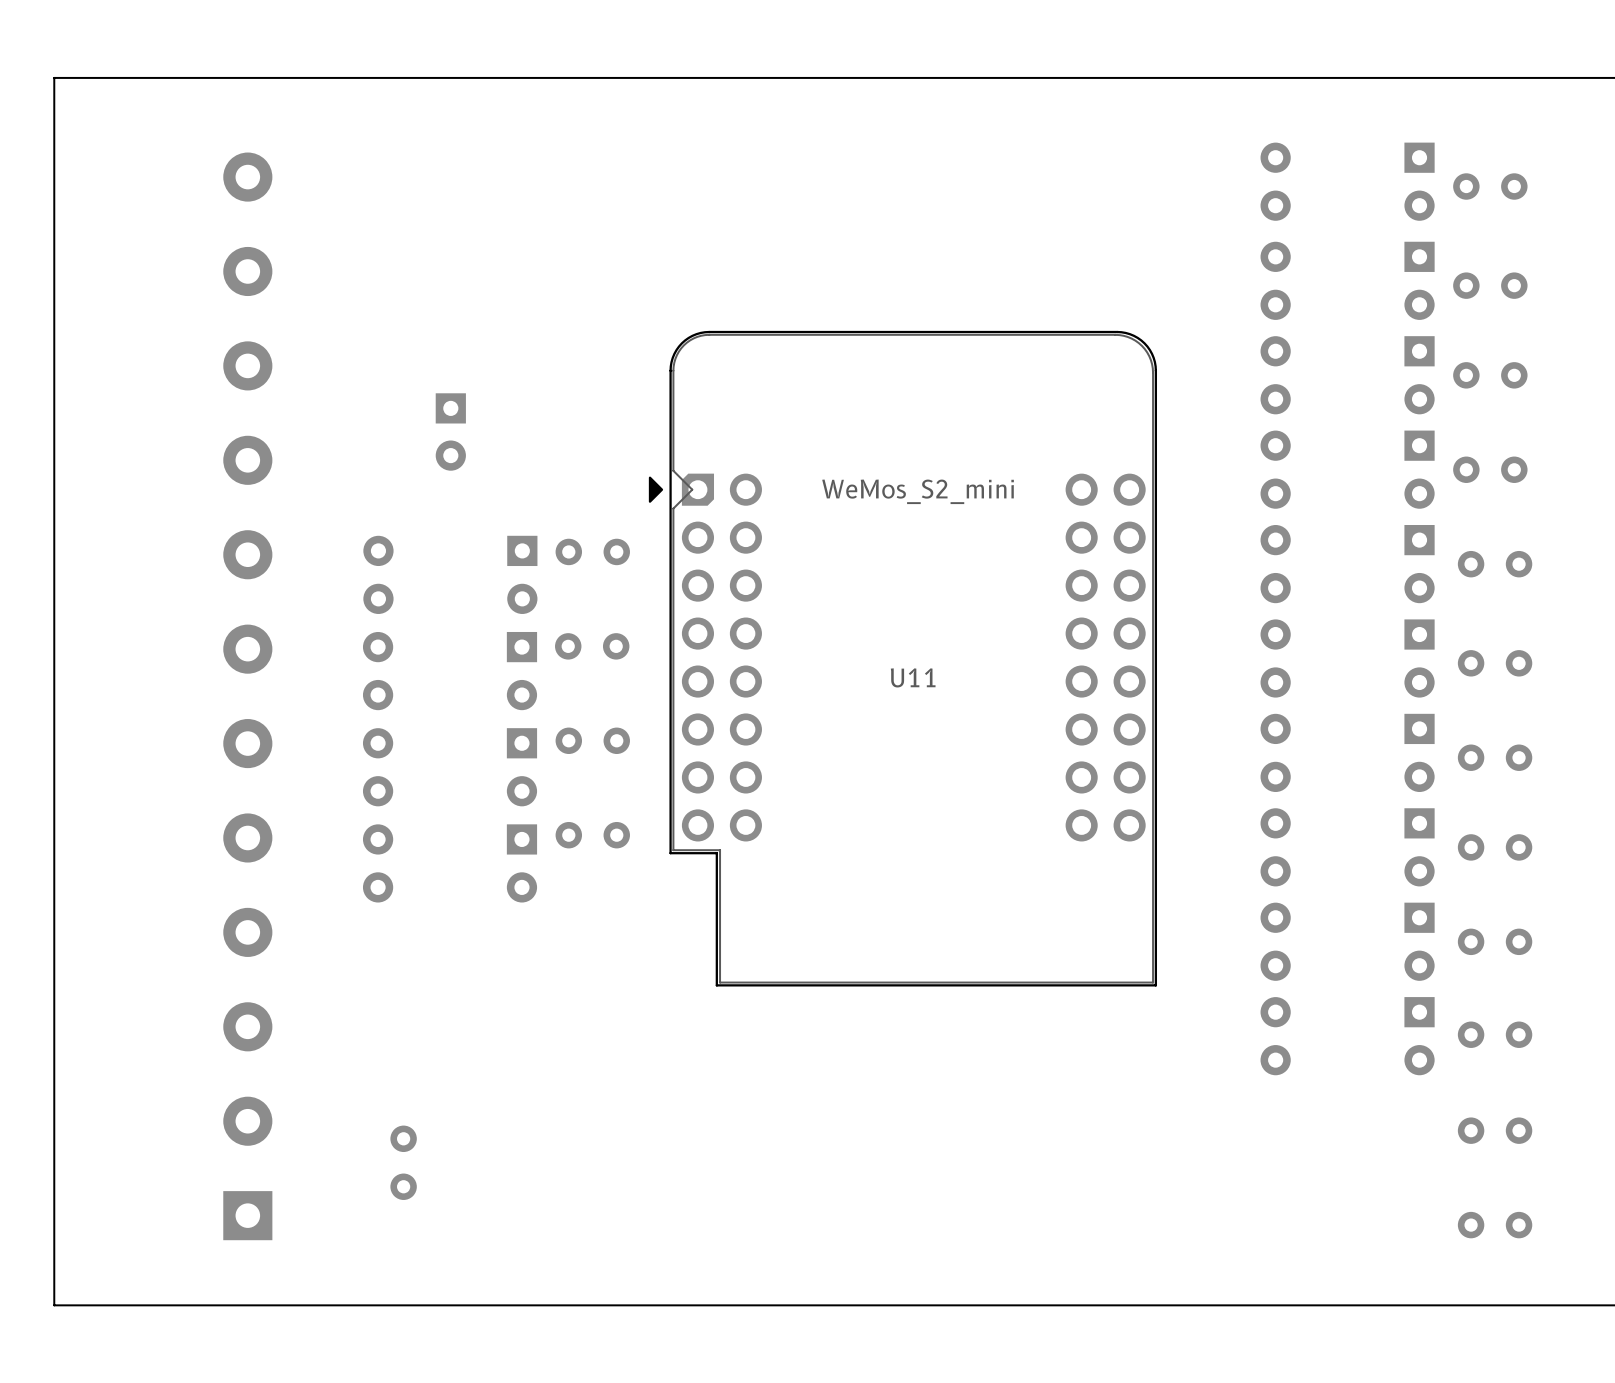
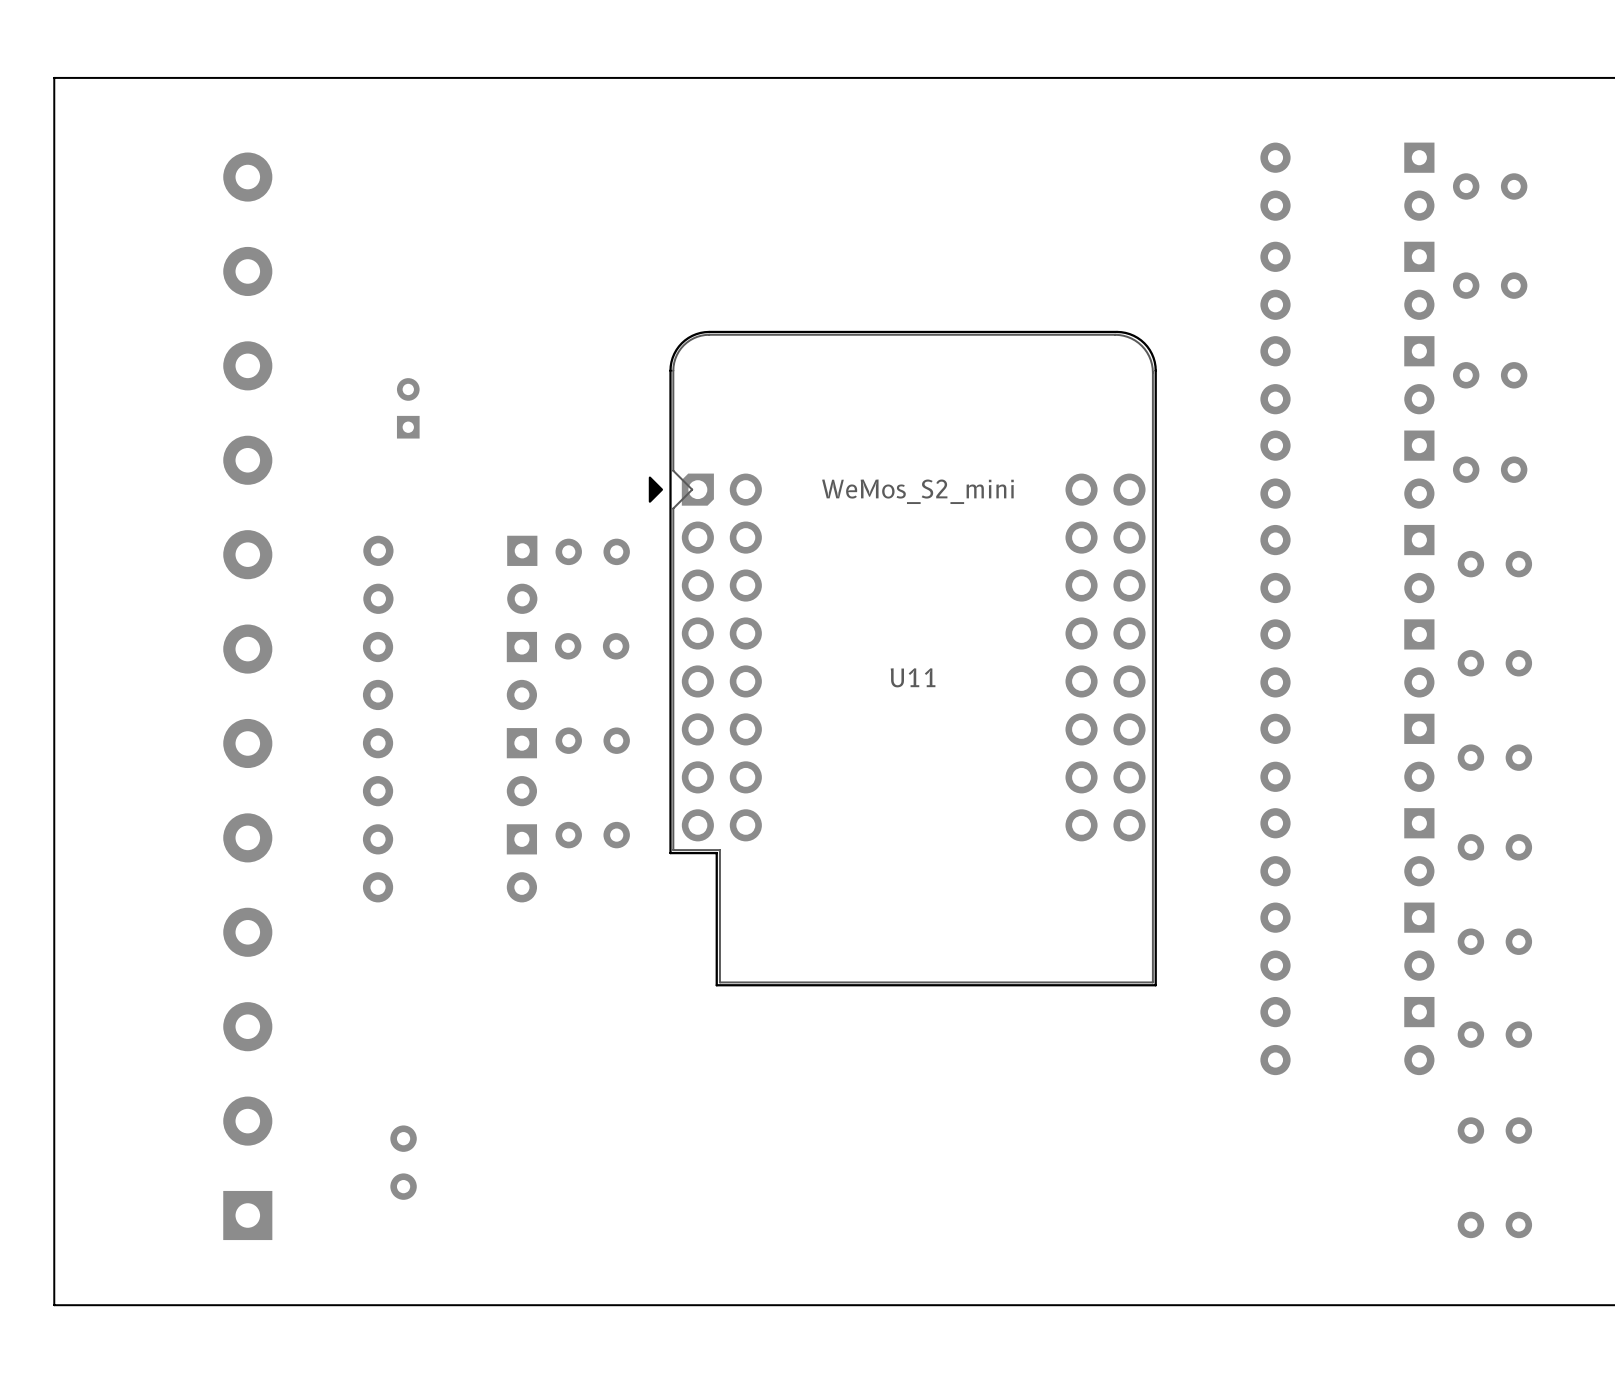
part: none -> (408, 408)
part: (450, 431) -> none

